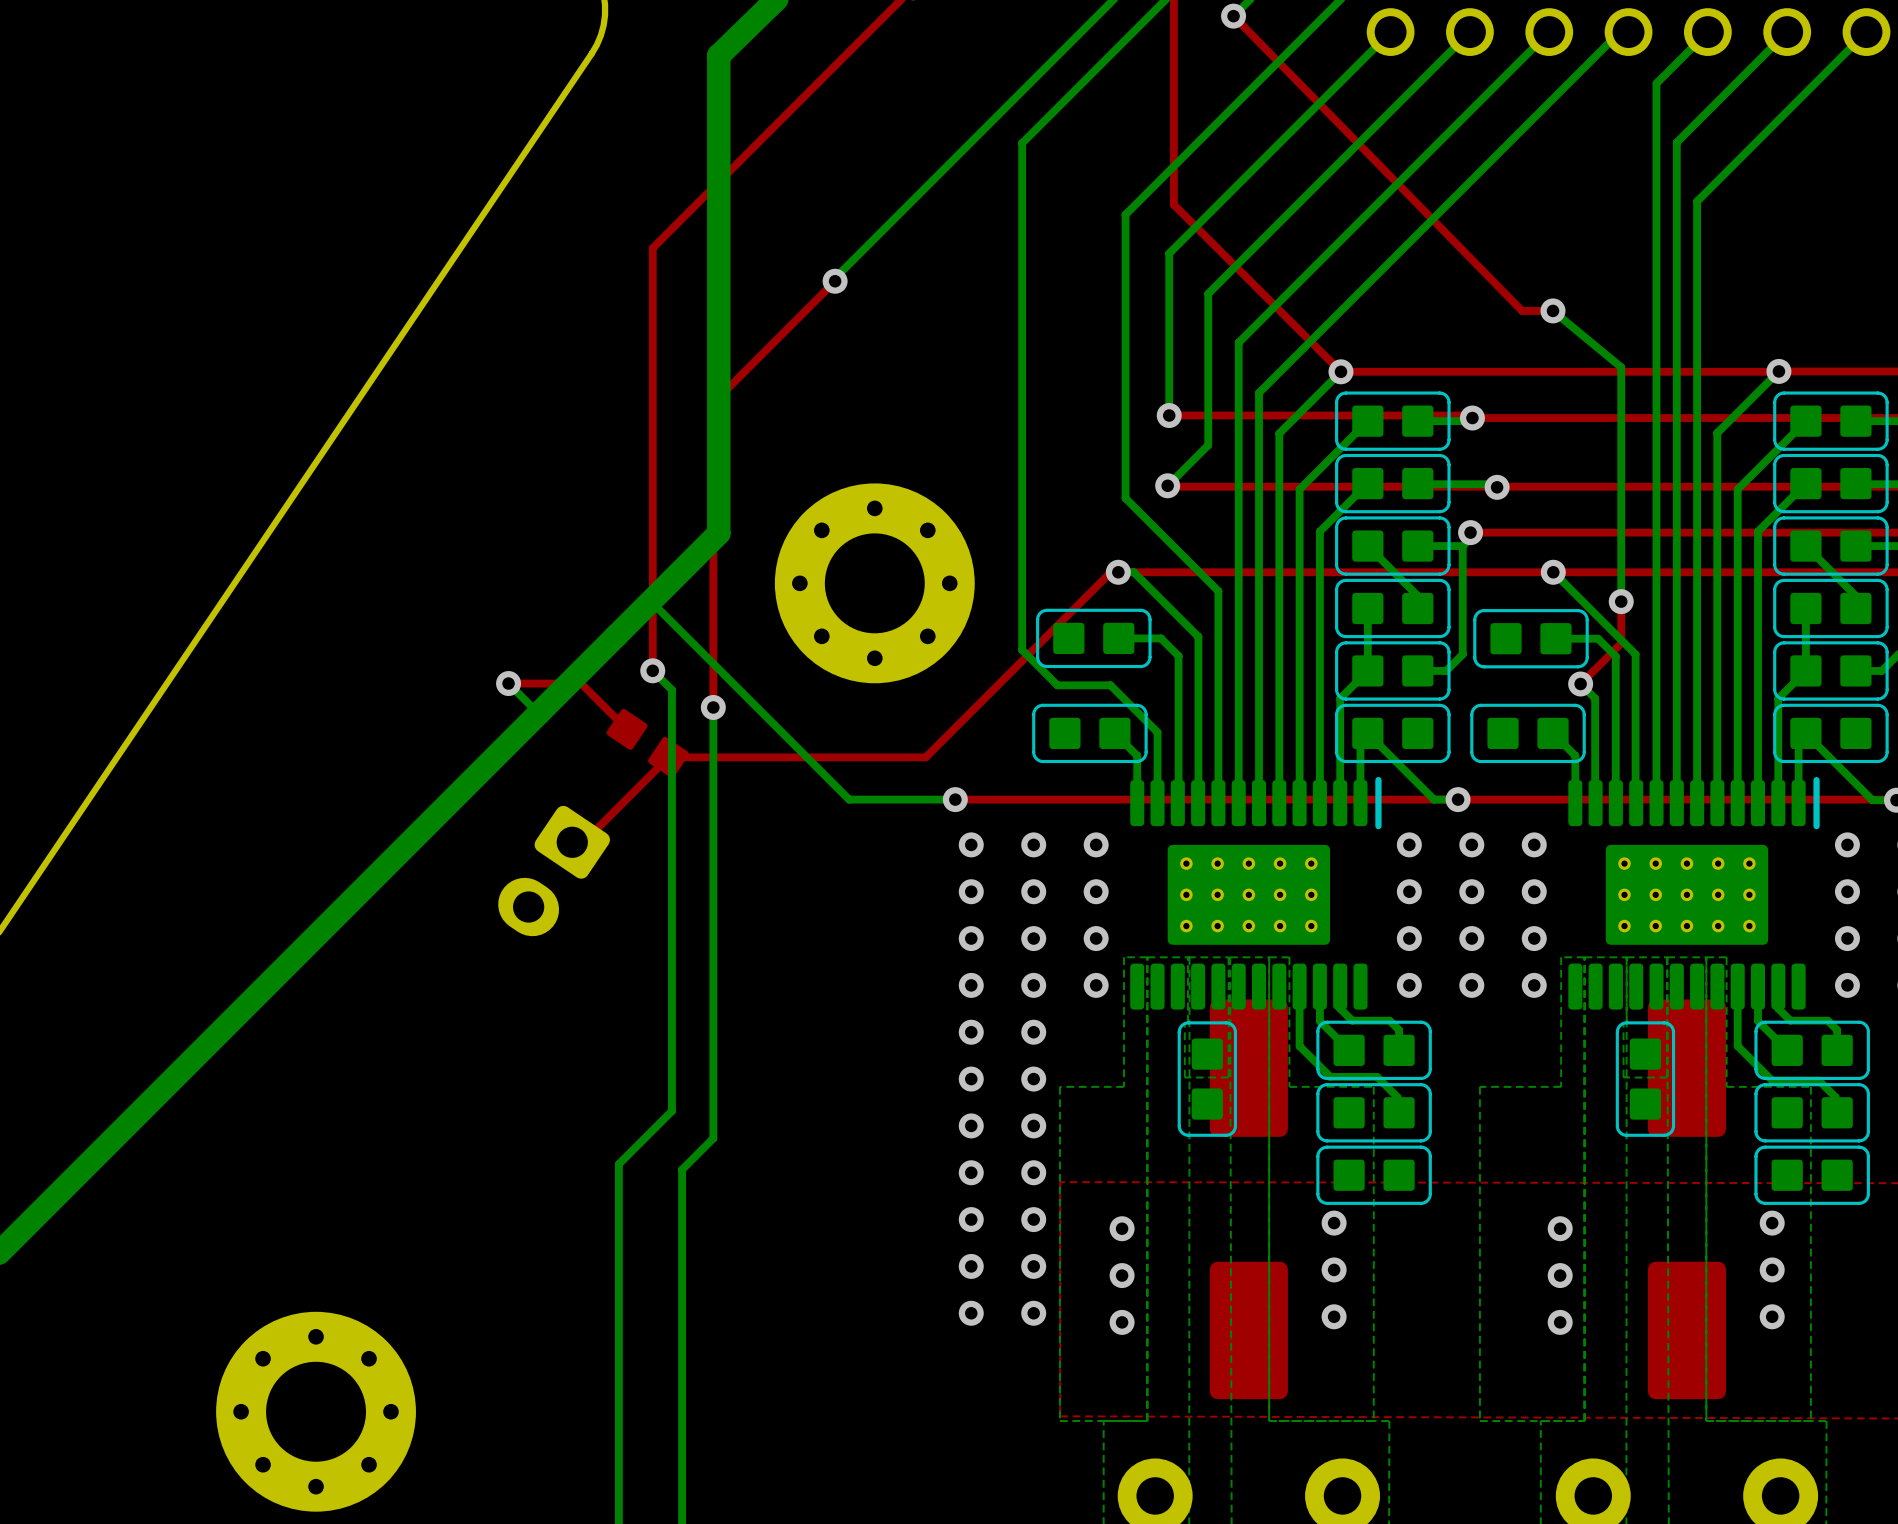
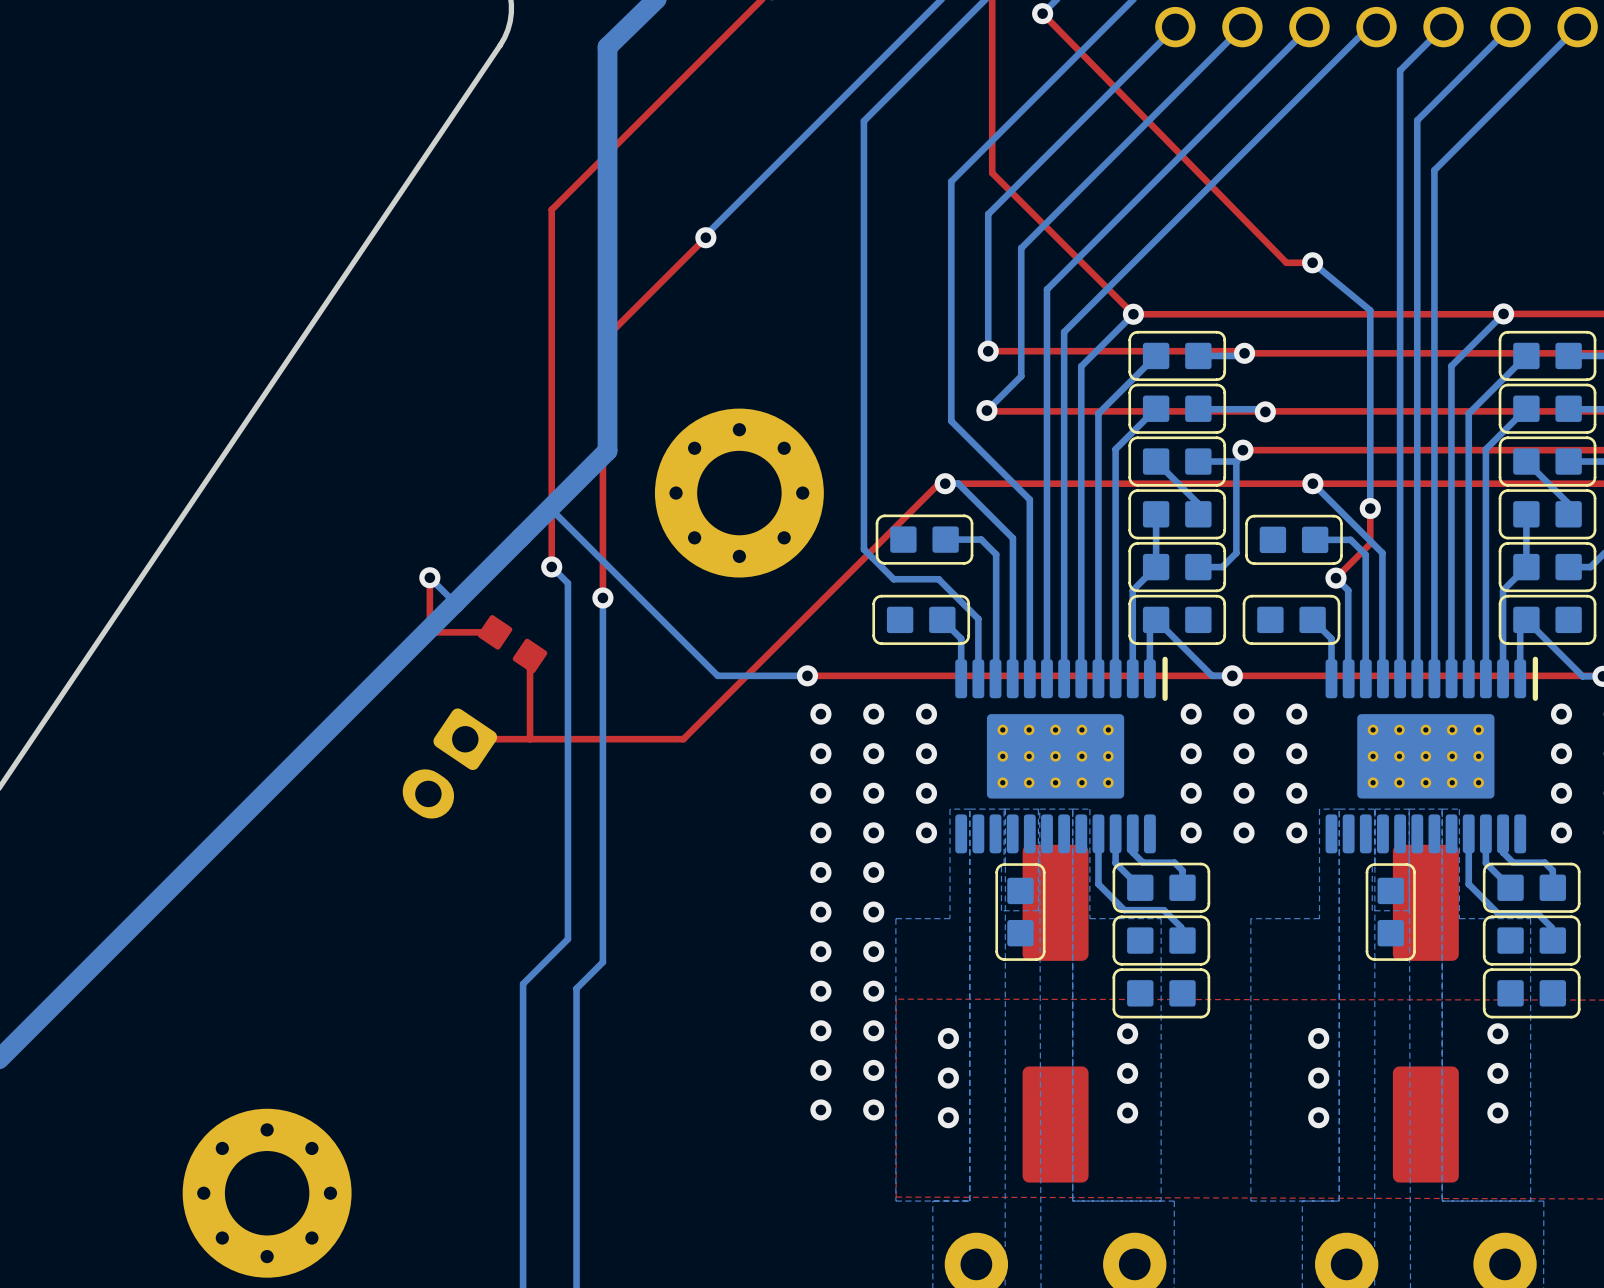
top track: (508, 683) (581, 683) (627, 729) -> (429, 577) (429, 627) (434, 632) (495, 632)
part position: (647, 743) -> (512, 644)
top track: (925, 757) (668, 757) (583, 842) (572, 842) -> (782, 640) (683, 739) (465, 739)
top track: none -> (530, 655) (530, 739)
part position: (554, 871) -> (449, 763)

